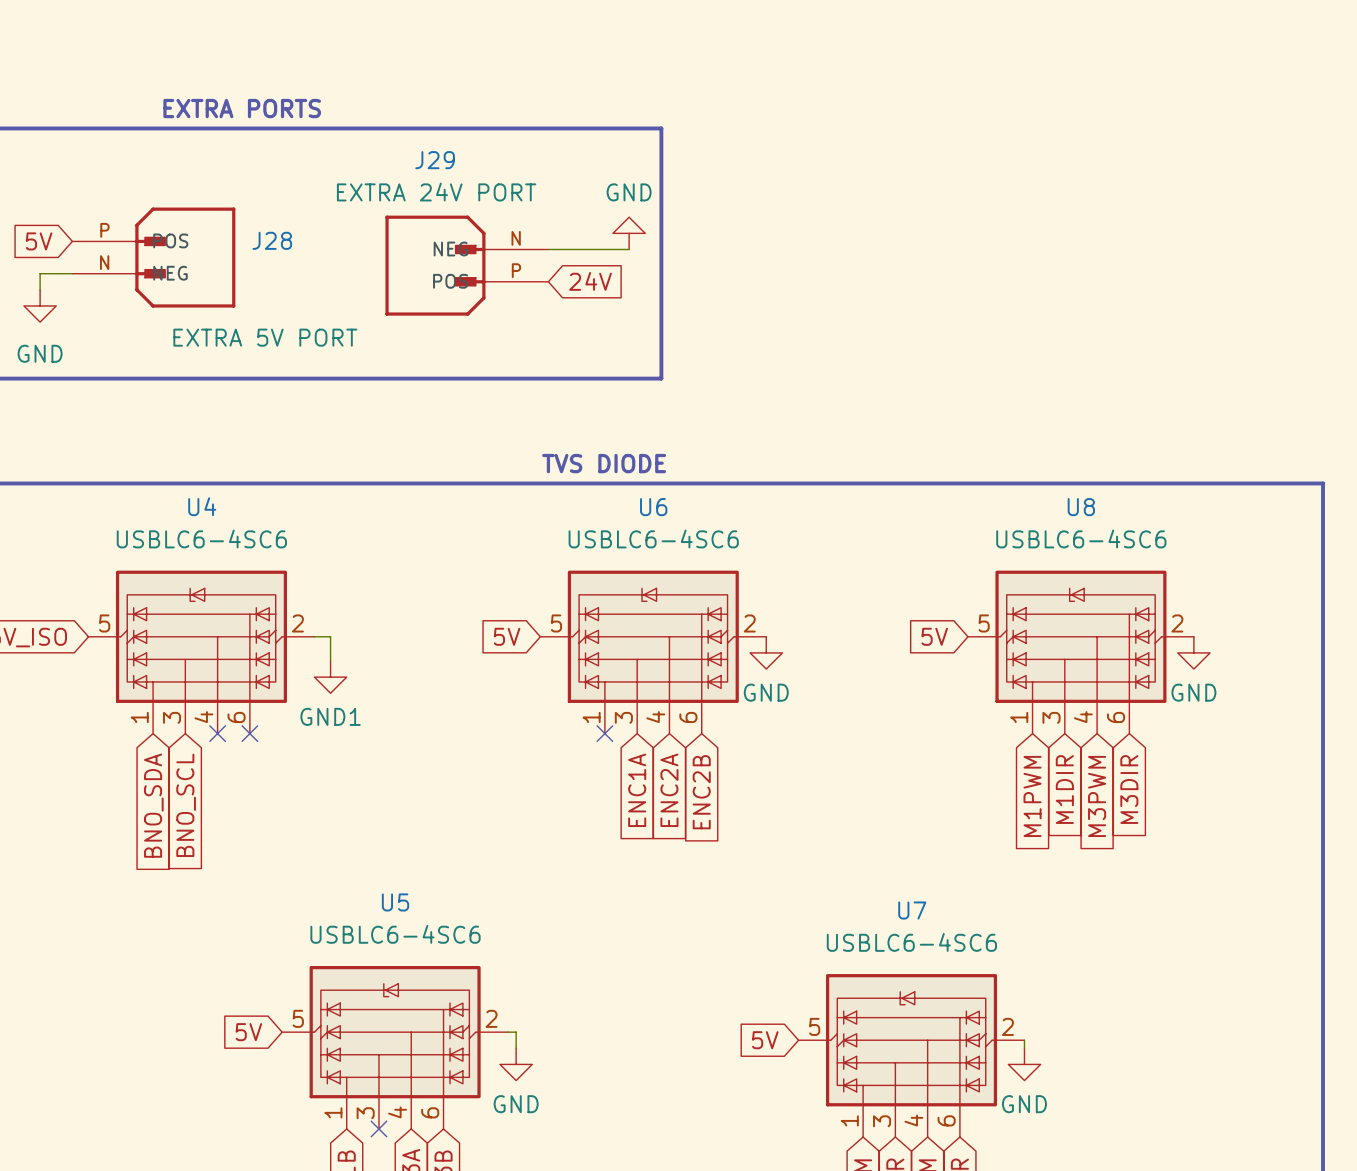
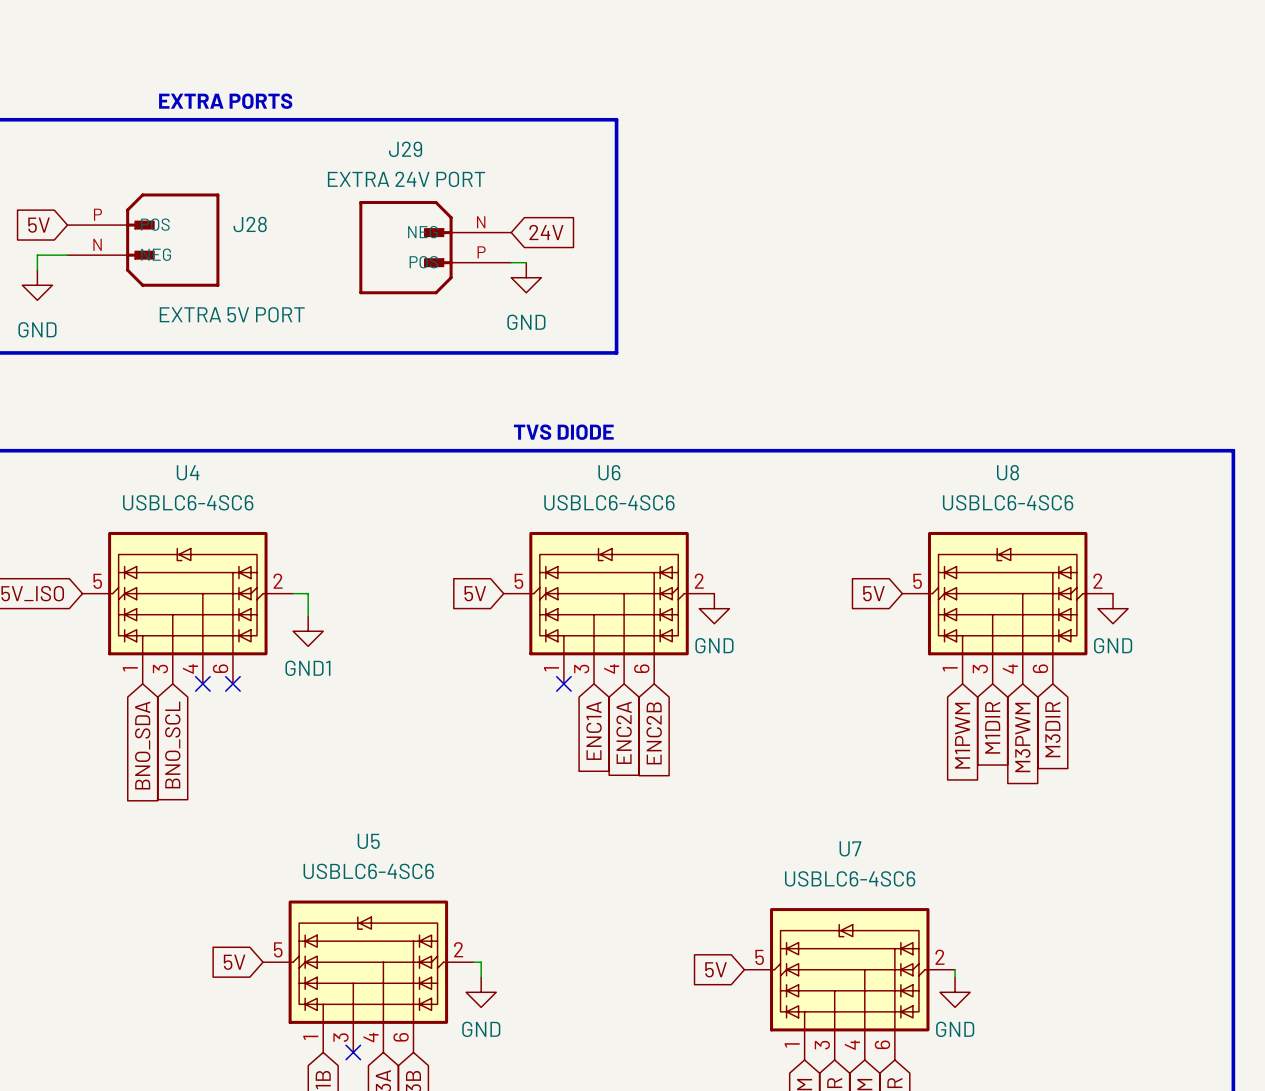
power symbol rotation: 0° (629, 233) -> 180° (526, 277)
power symbol position: GND (629, 233) -> GND (526, 277)
wire: (548, 249) (629, 249) -> none
wire: none -> (511, 262) (526, 262)
global label position: 24V (590, 281) -> 24V (546, 232)

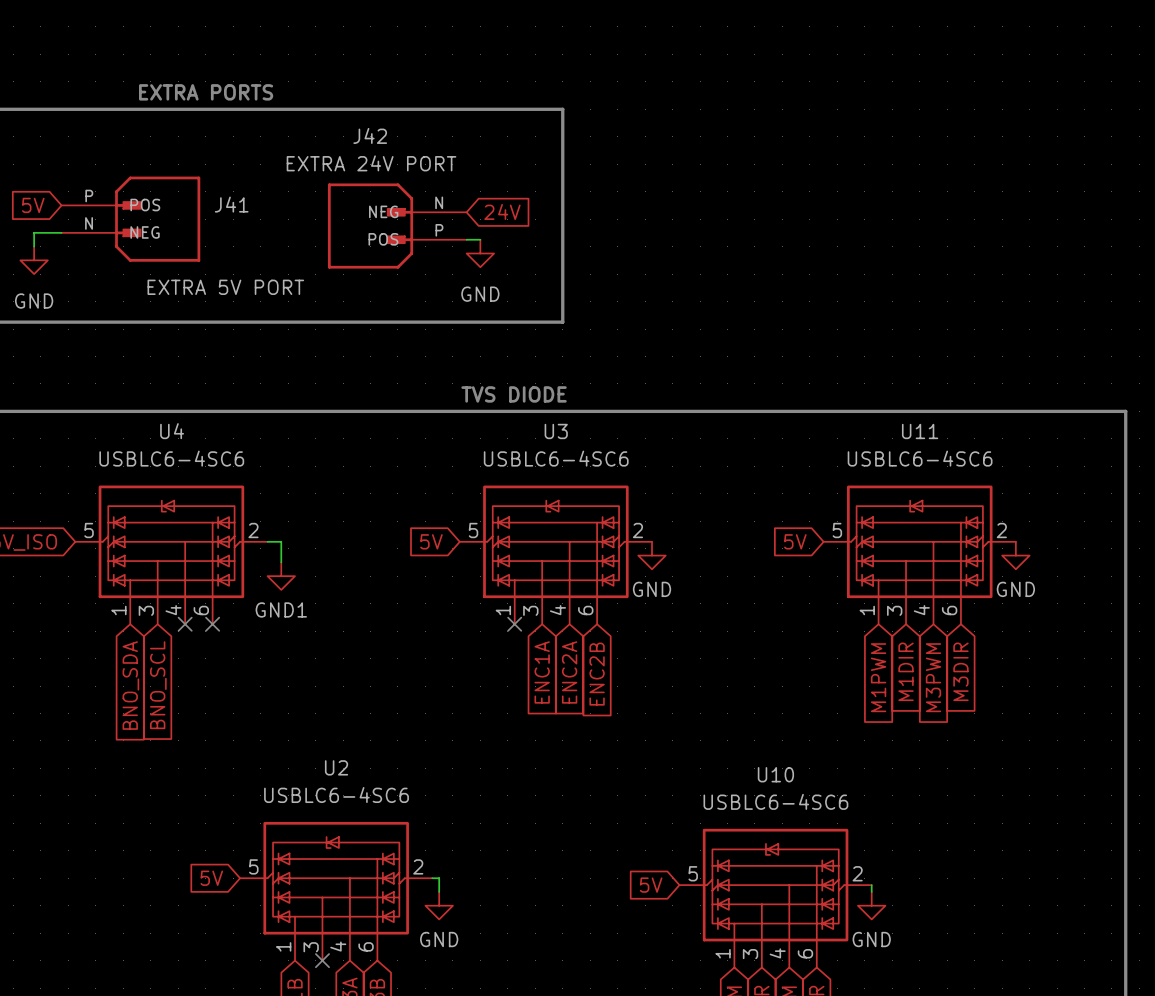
J29 name: J29 (405, 149) -> J42 (370, 135)
J28 name: J28 (250, 224) -> J41 (231, 204)
U6 name: U6 (609, 472) -> U3 (556, 431)
U8 name: U8 (1007, 472) -> U11 (920, 431)
U5 name: U5 (368, 841) -> U2 (336, 767)
U7 name: U7 (850, 848) -> U10 (775, 774)

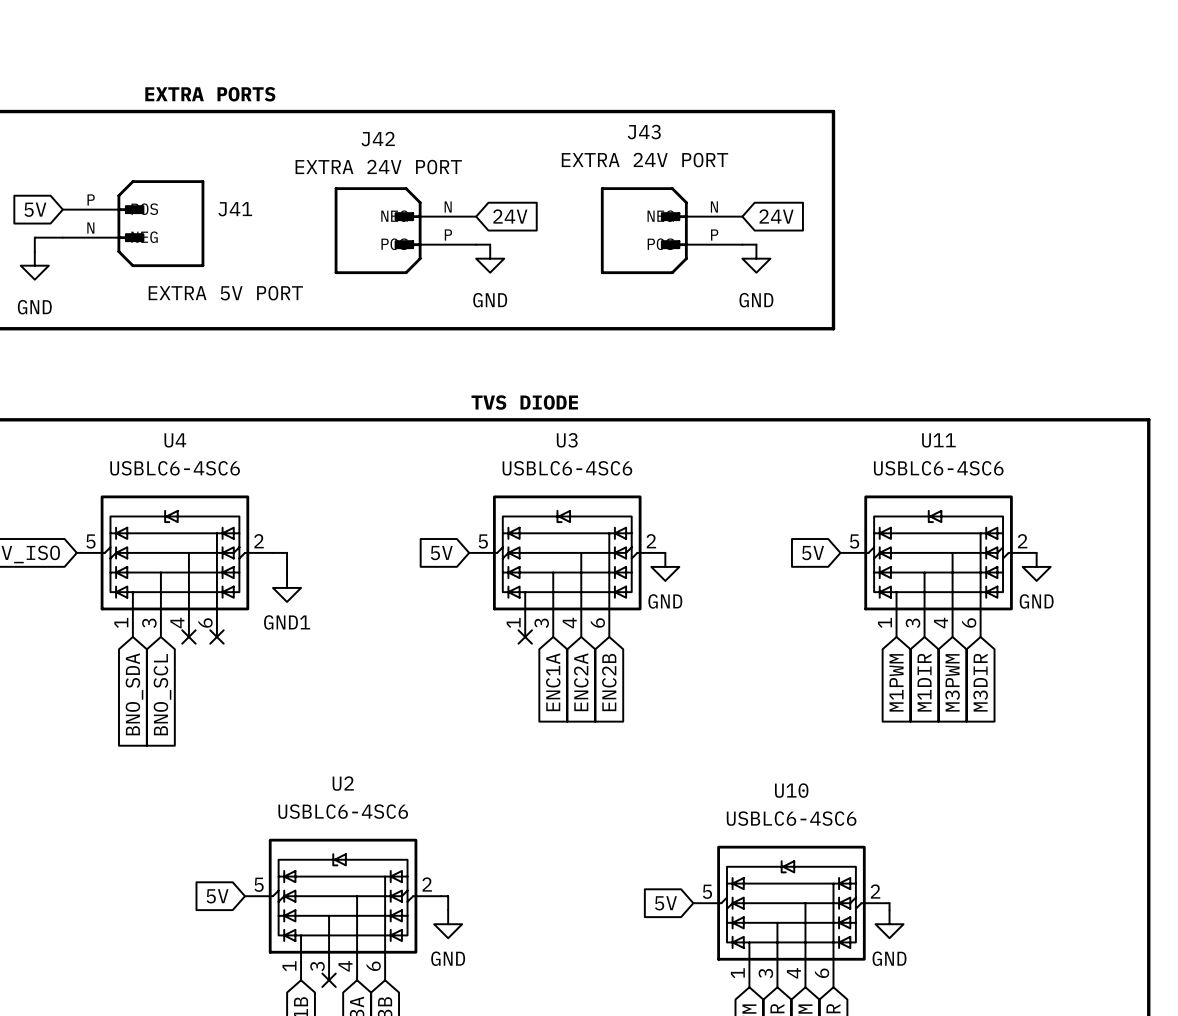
line: (562, 109) (562, 322) -> (574, 111) (833, 111) (833, 328) (574, 328)
global label: none -> 24V (776, 216)
J43: none -> EXTRA 24V PORT (671, 230)
wire: none -> (742, 244) (756, 244)
power symbol: none -> GND (756, 258)

